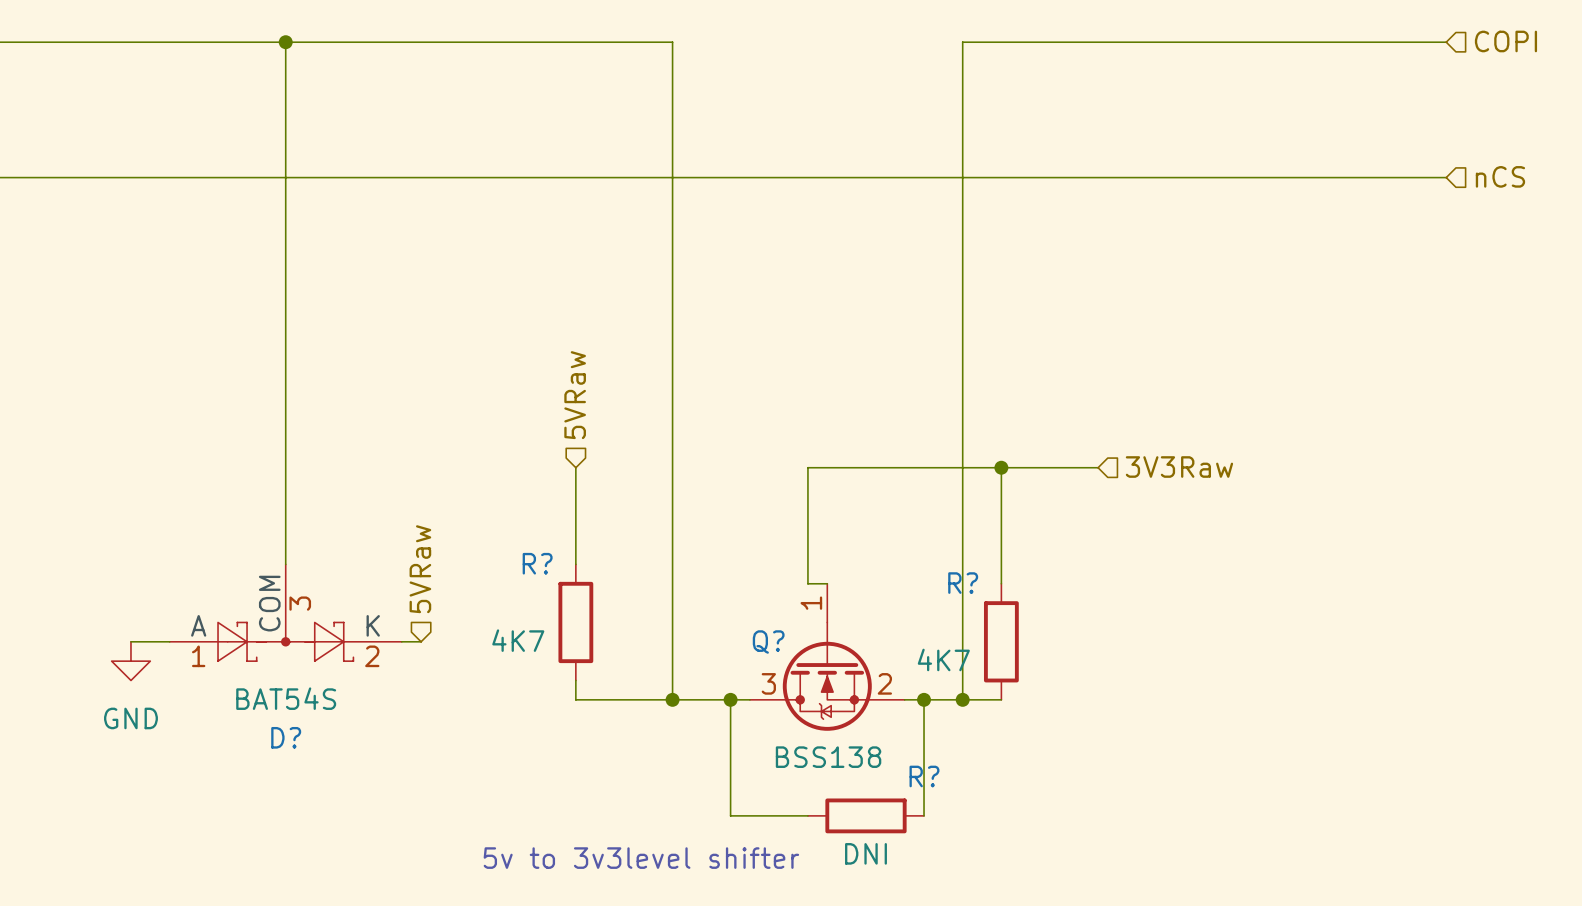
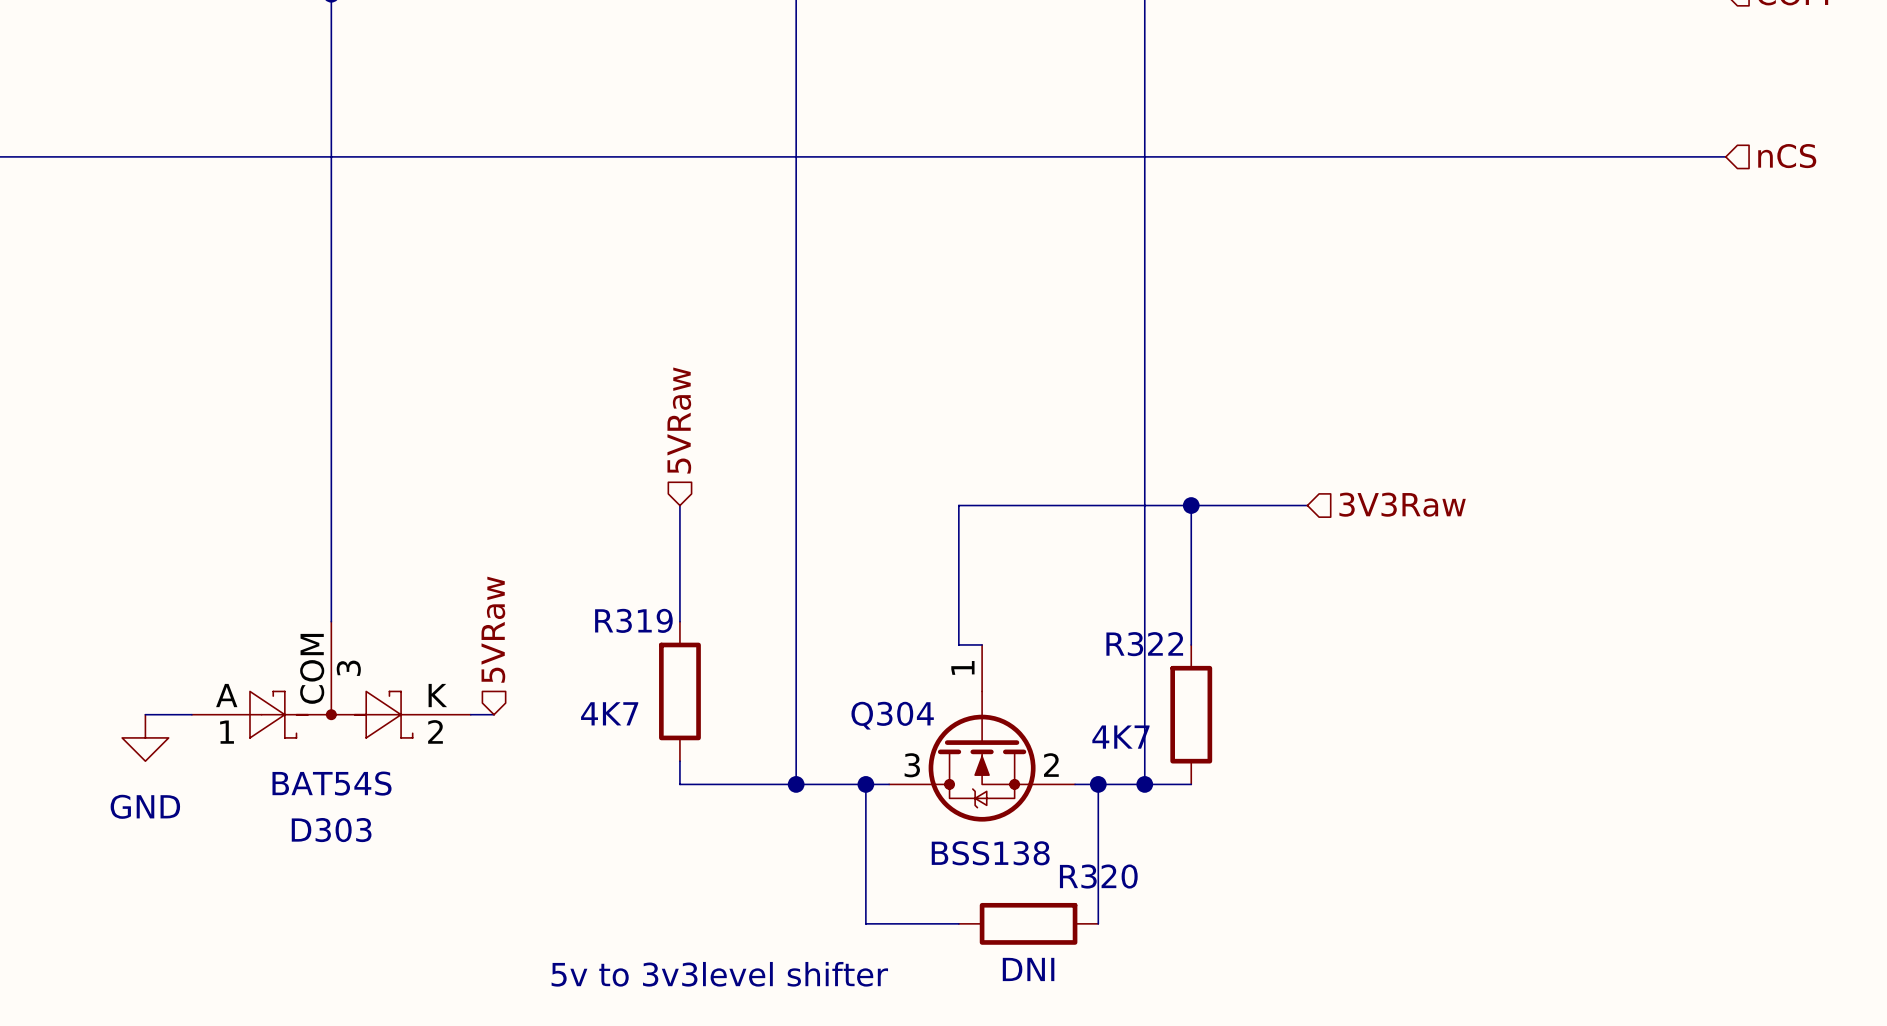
R? name: R? (537, 563) -> R319 (633, 620)
R? name: R? (963, 583) -> R322 (1144, 644)
Q? name: Q? (768, 642) -> Q304 (892, 715)
D? name: D? (286, 737) -> D303 (331, 830)
R? name: R? (924, 776) -> R320 (1098, 876)

